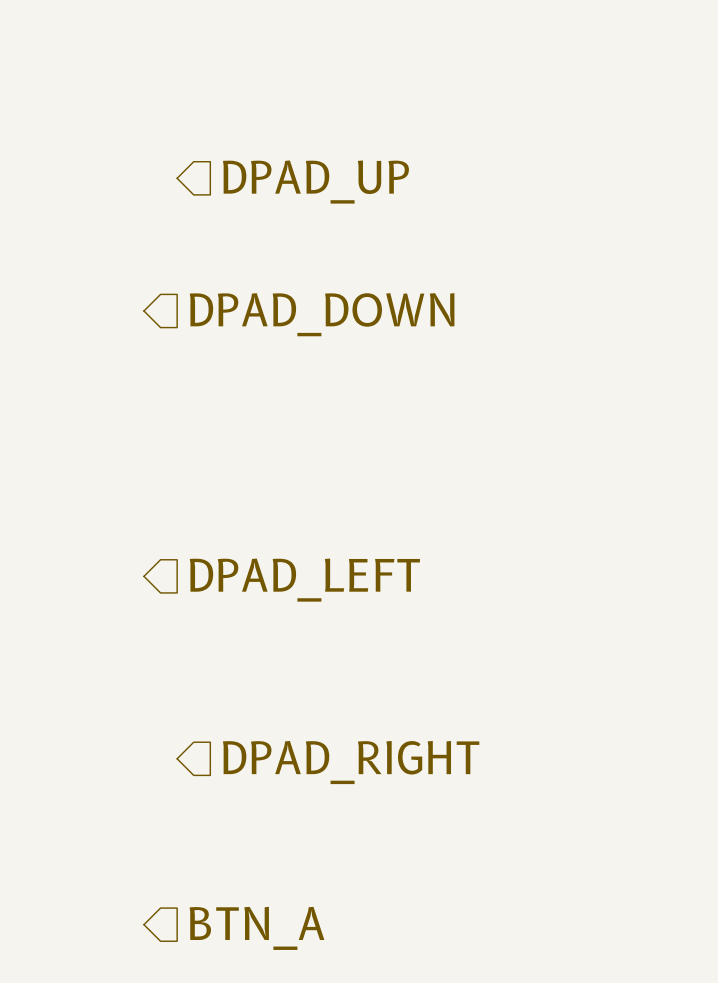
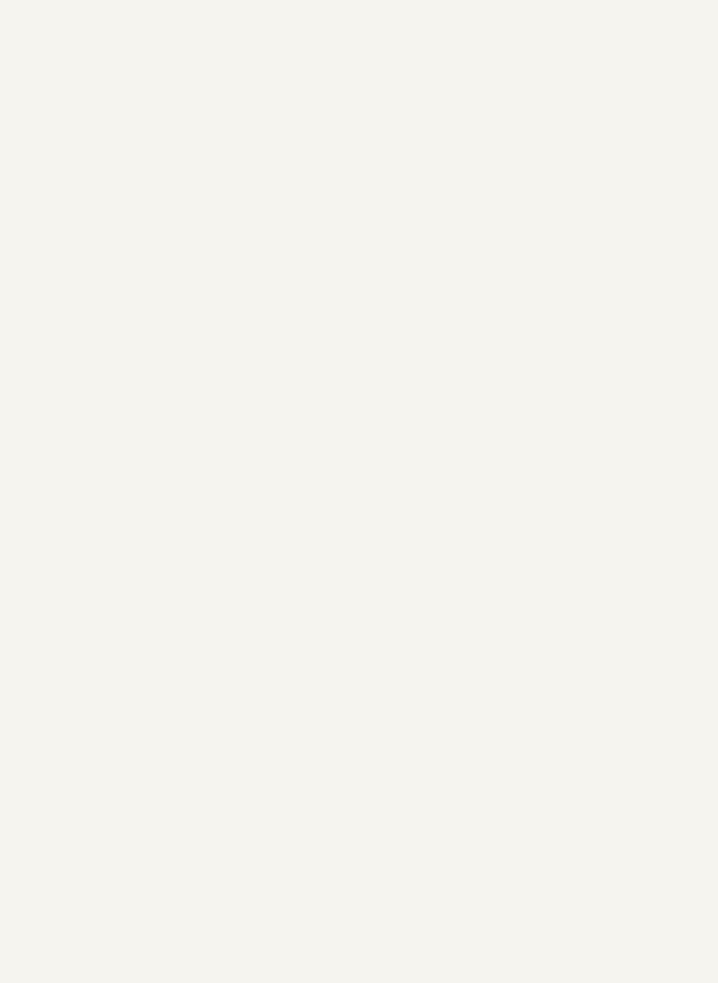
hierarchical label: DPAD_UP (315, 182) -> none
hierarchical label: DPAD_DOWN (322, 314) -> none
hierarchical label: DPAD_LEFT (304, 580) -> none
hierarchical label: DPAD_RIGHT (351, 762) -> none
hierarchical label: BTN_A (256, 928) -> none

